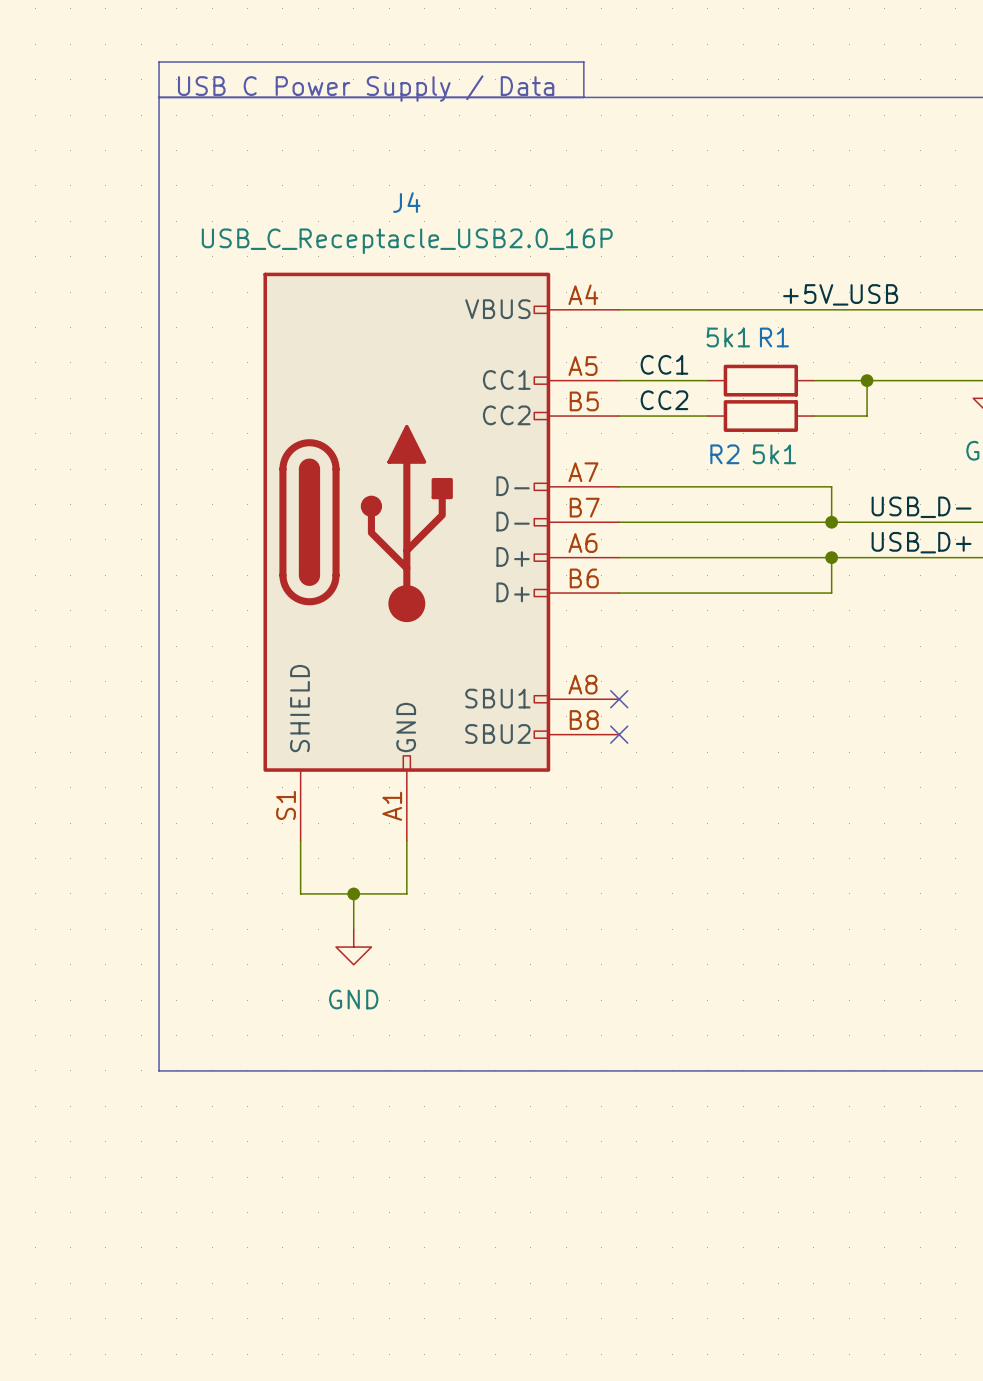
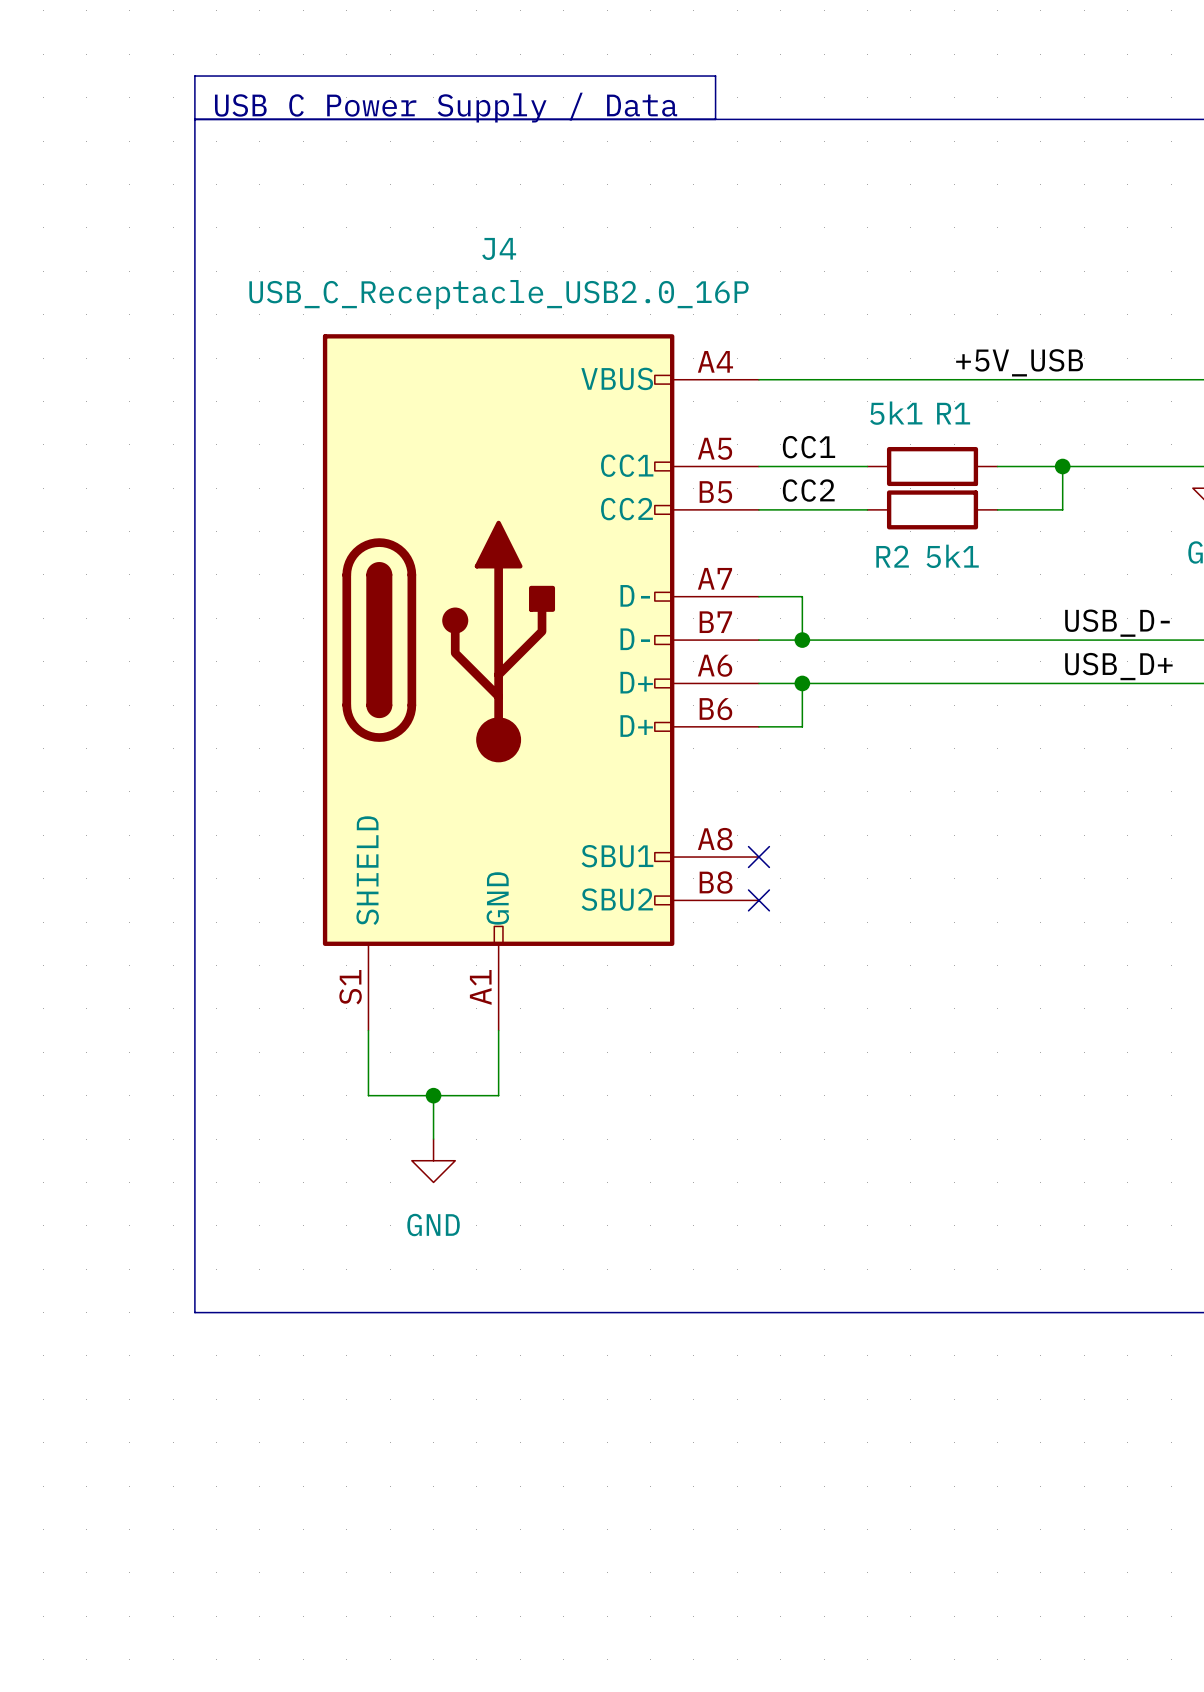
wire: (654, 486) (831, 486) (831, 522) -> (802, 596) (802, 640)
junction: none -> (802, 640)
junction: (831, 522) -> none
junction: none -> (802, 683)
wire: (831, 557) (831, 593) (654, 593) -> (802, 683) (802, 726)
junction: (831, 557) -> none

